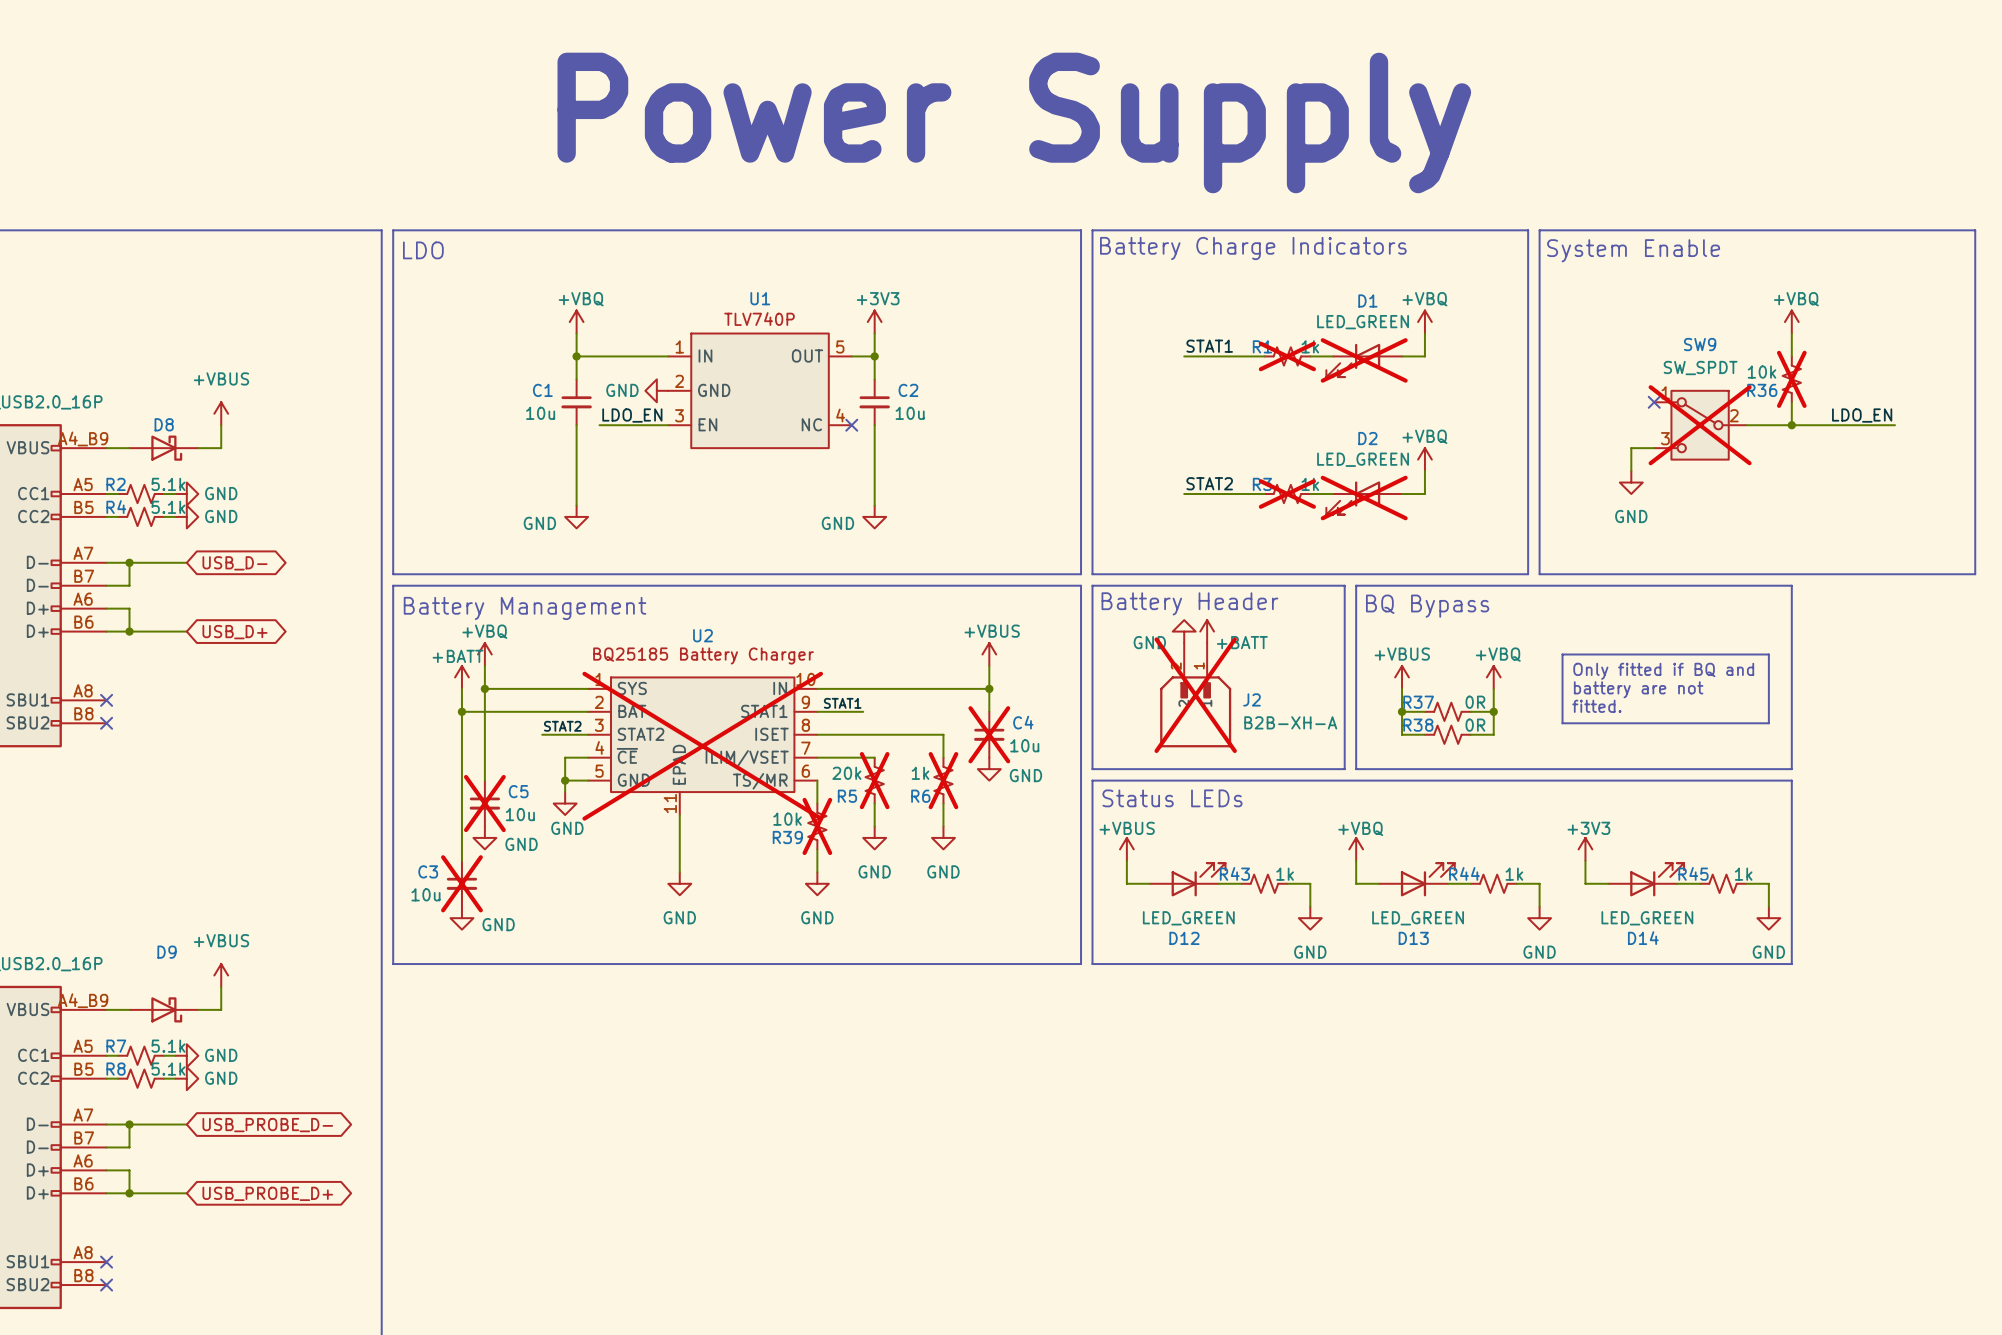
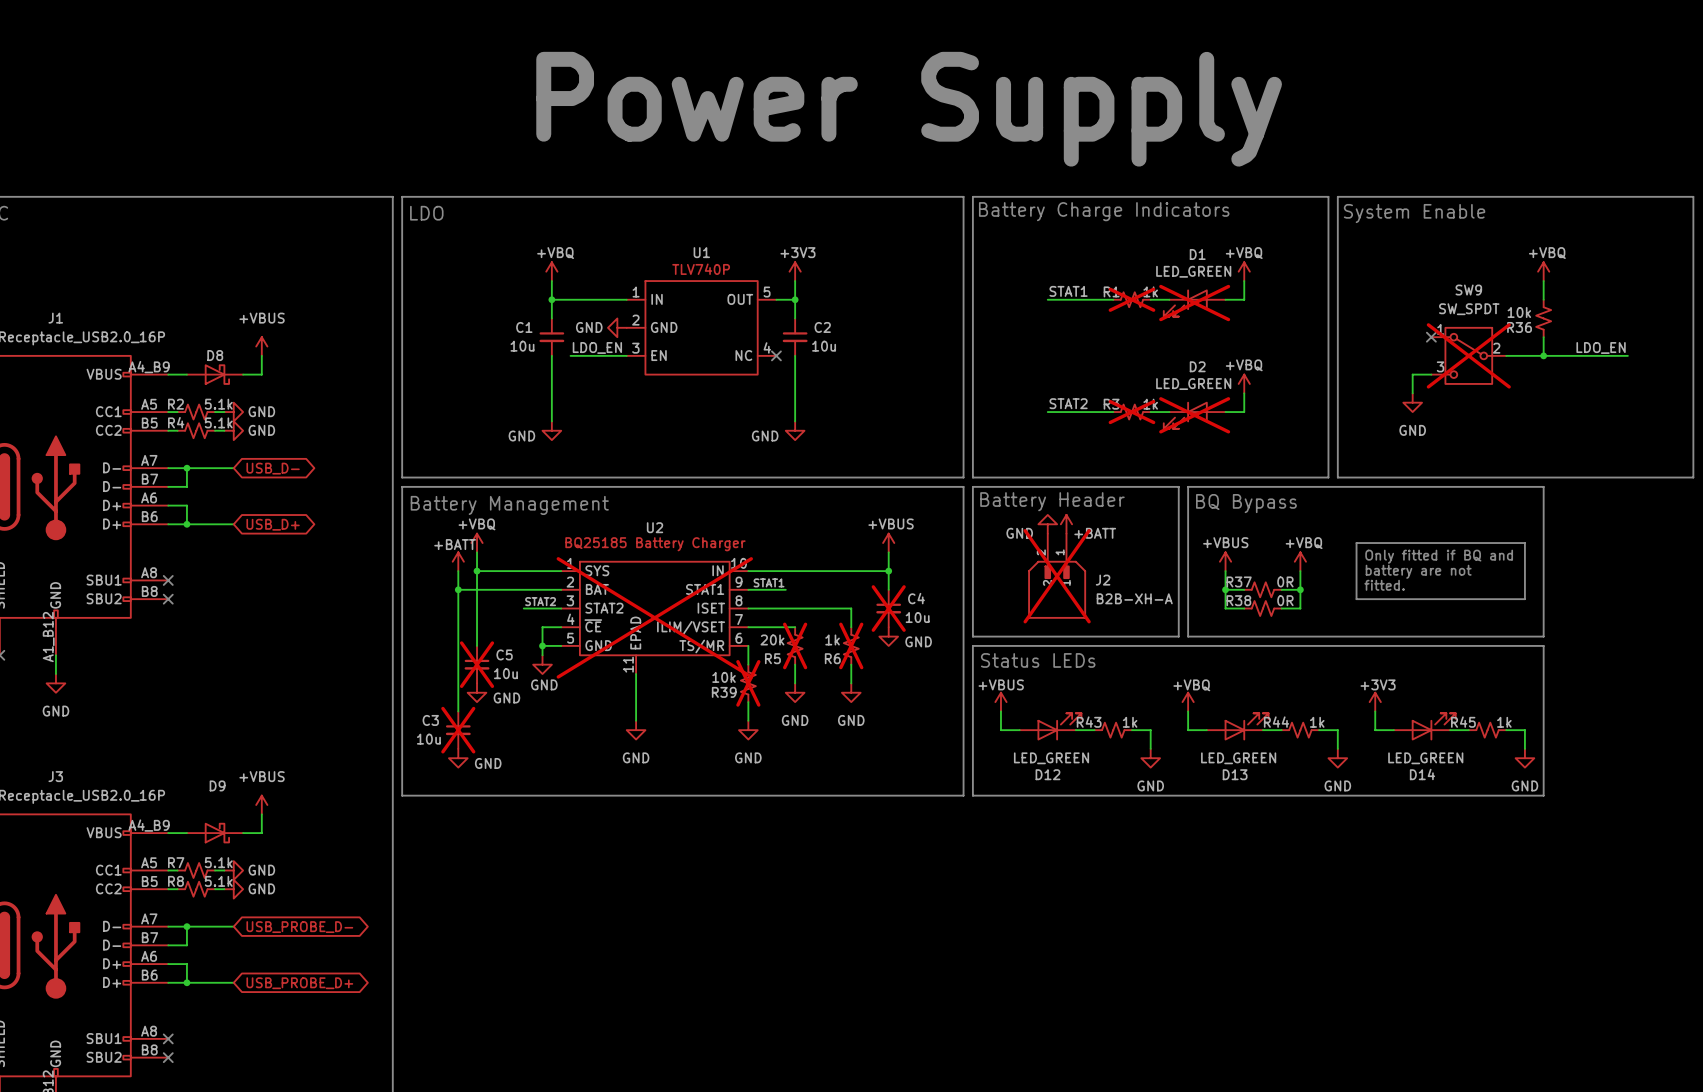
R36 do-not-place cross: (1791, 379) -> none

